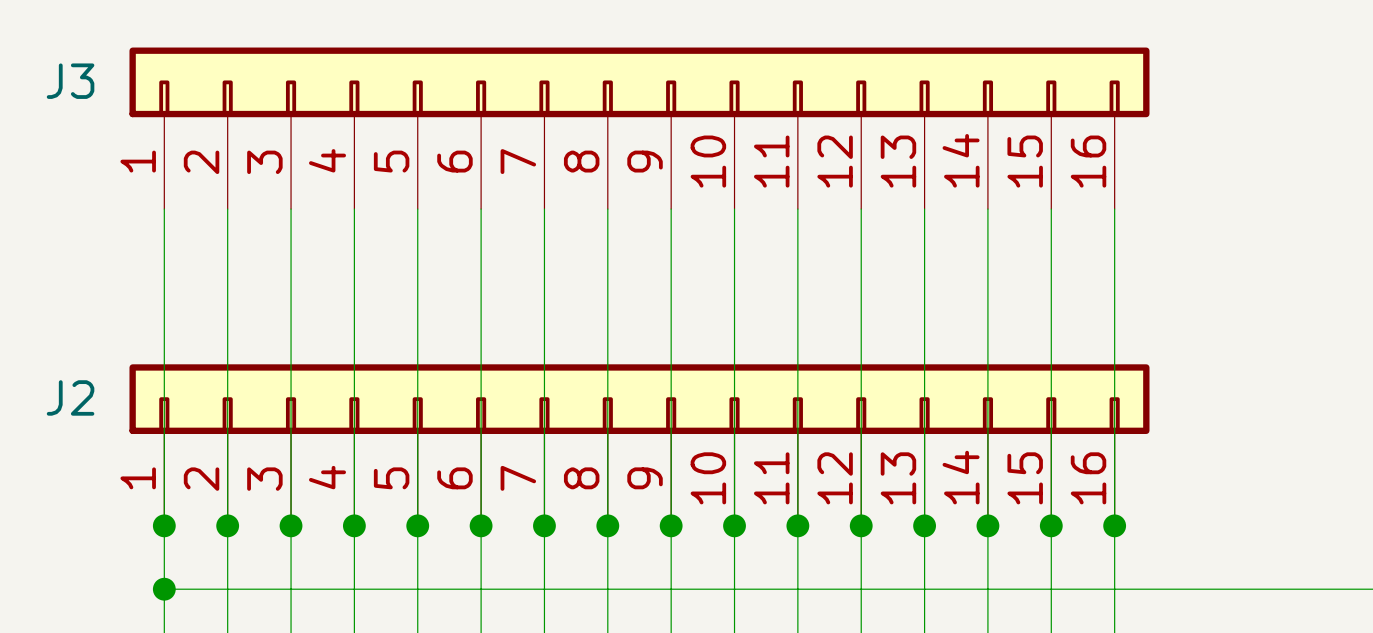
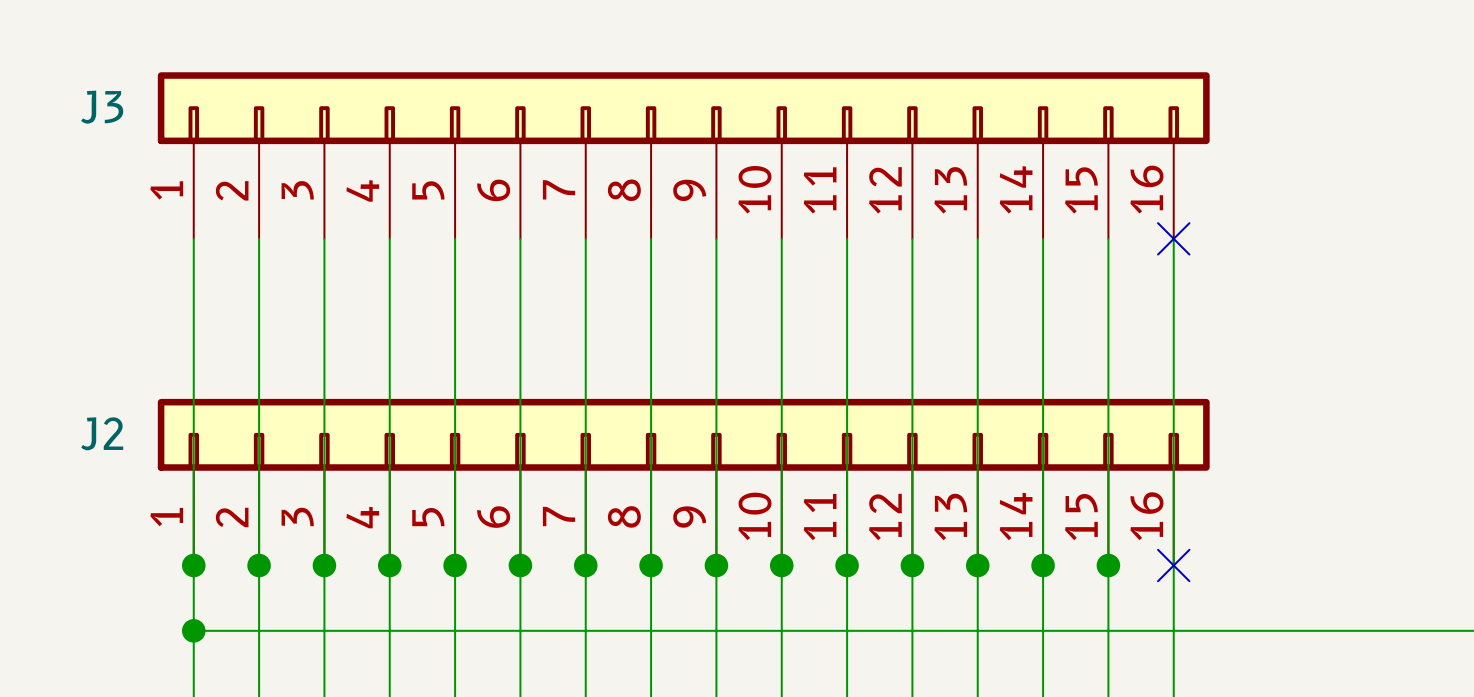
no-connect mark: none -> (1173, 238)
junction: (1114, 525) -> none
no-connect mark: none -> (1173, 565)

